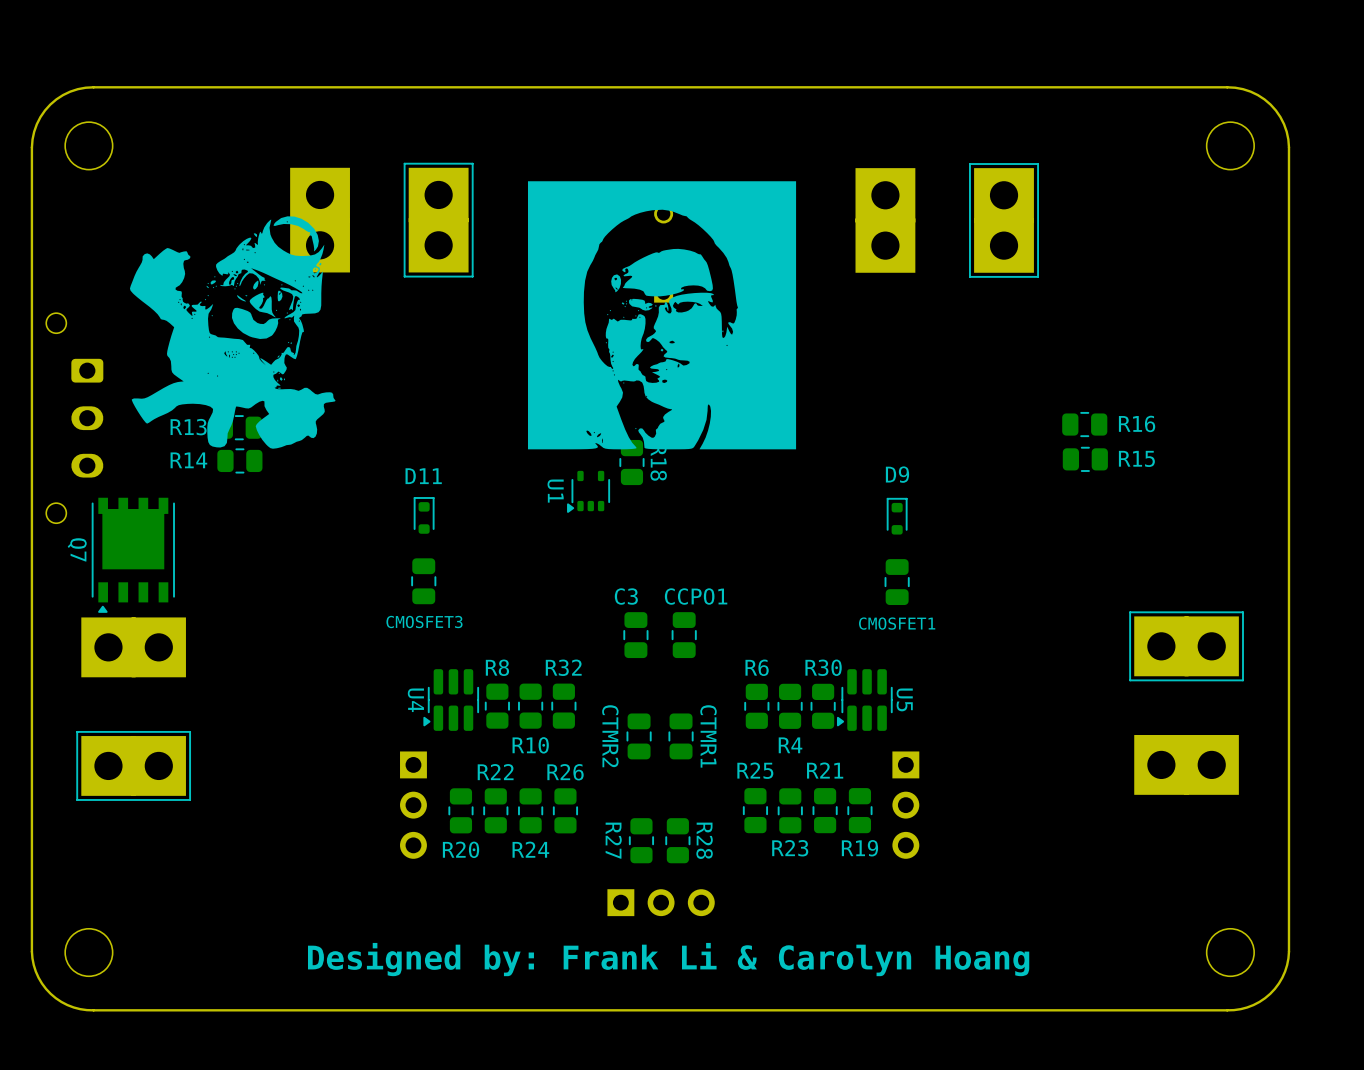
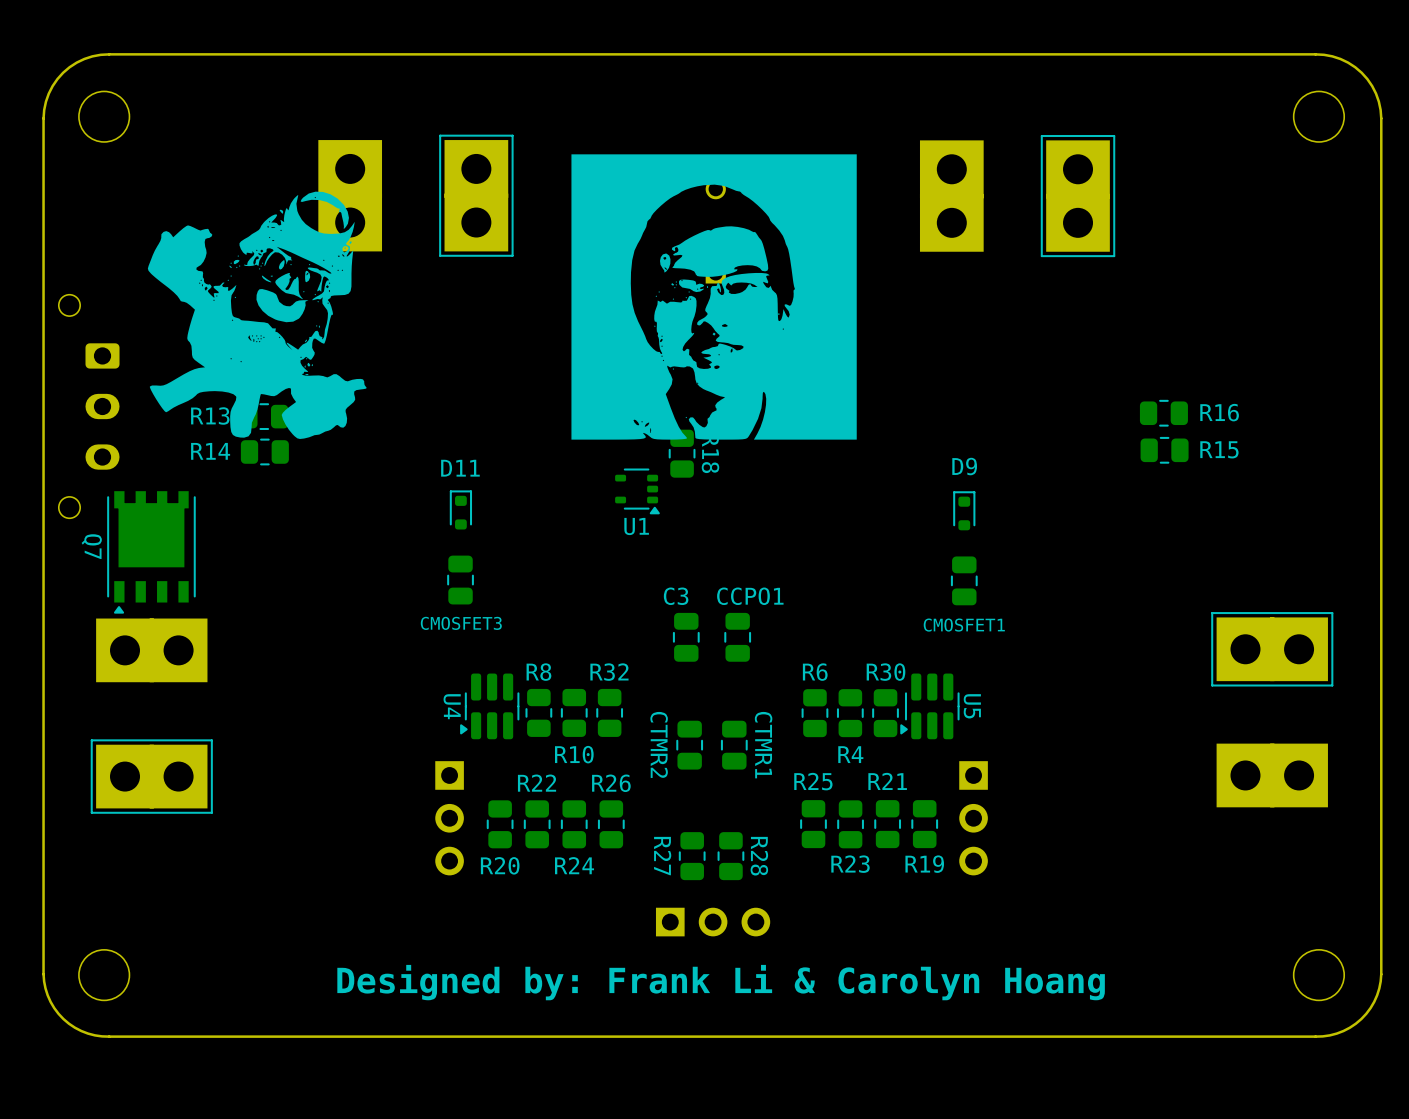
U1 rotation: 0° (588, 491) -> 90° counterclockwise (637, 491)

